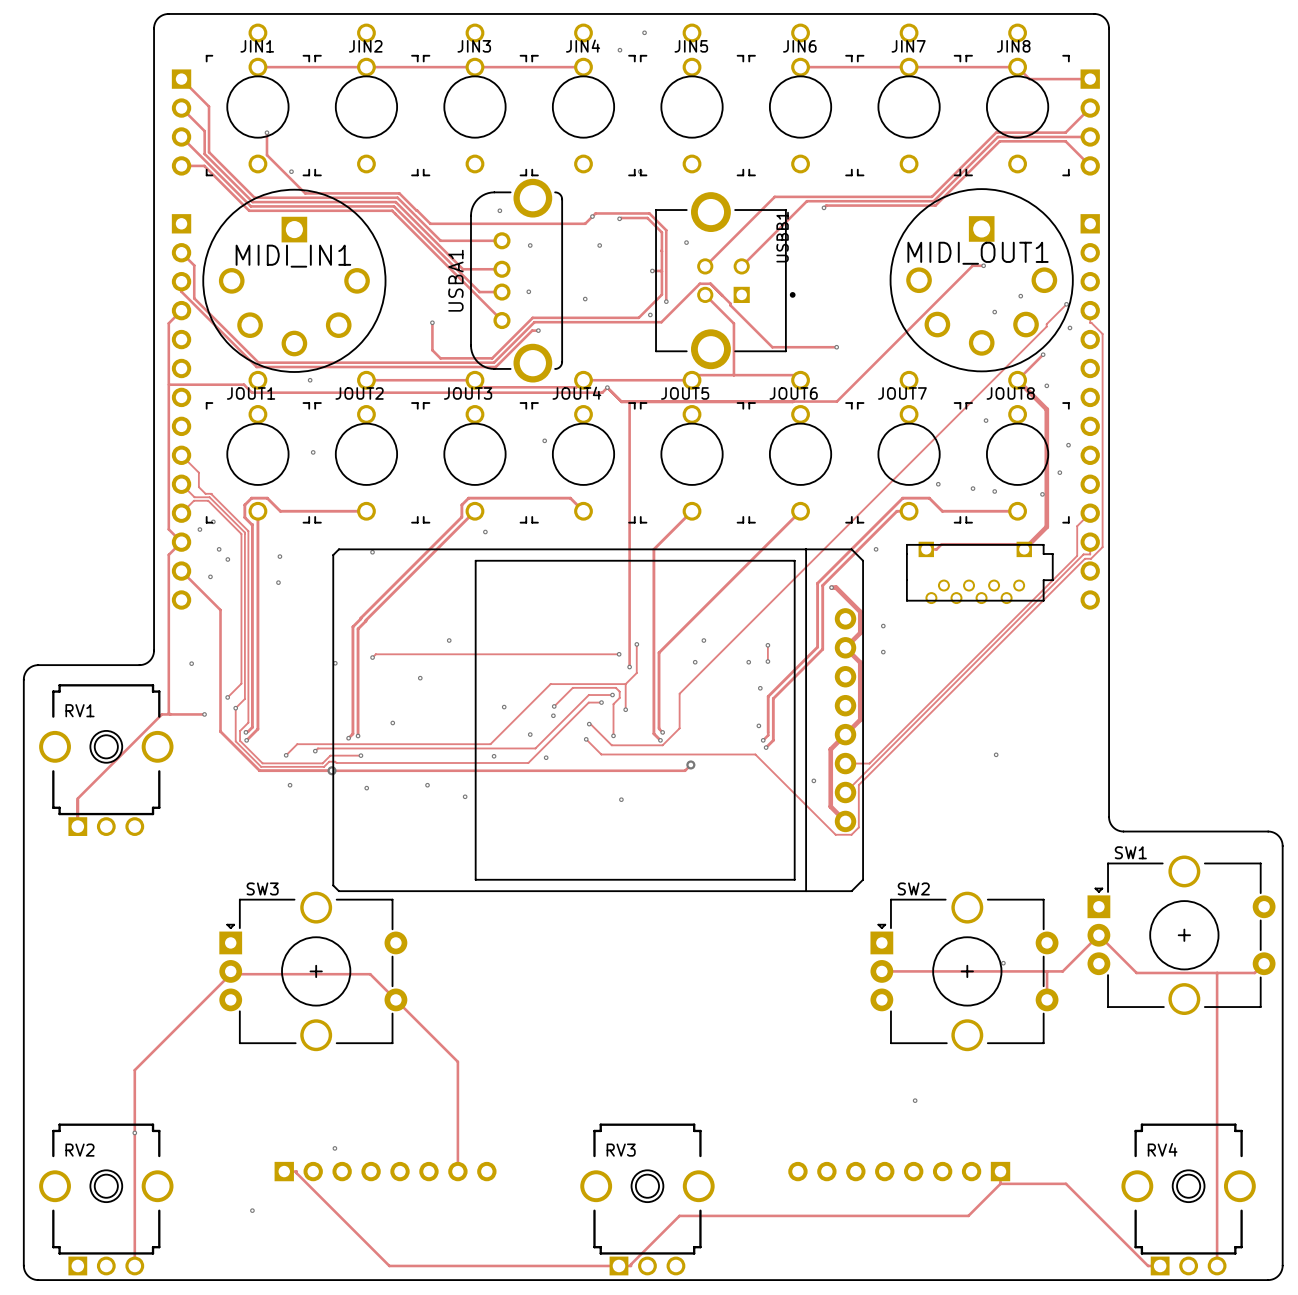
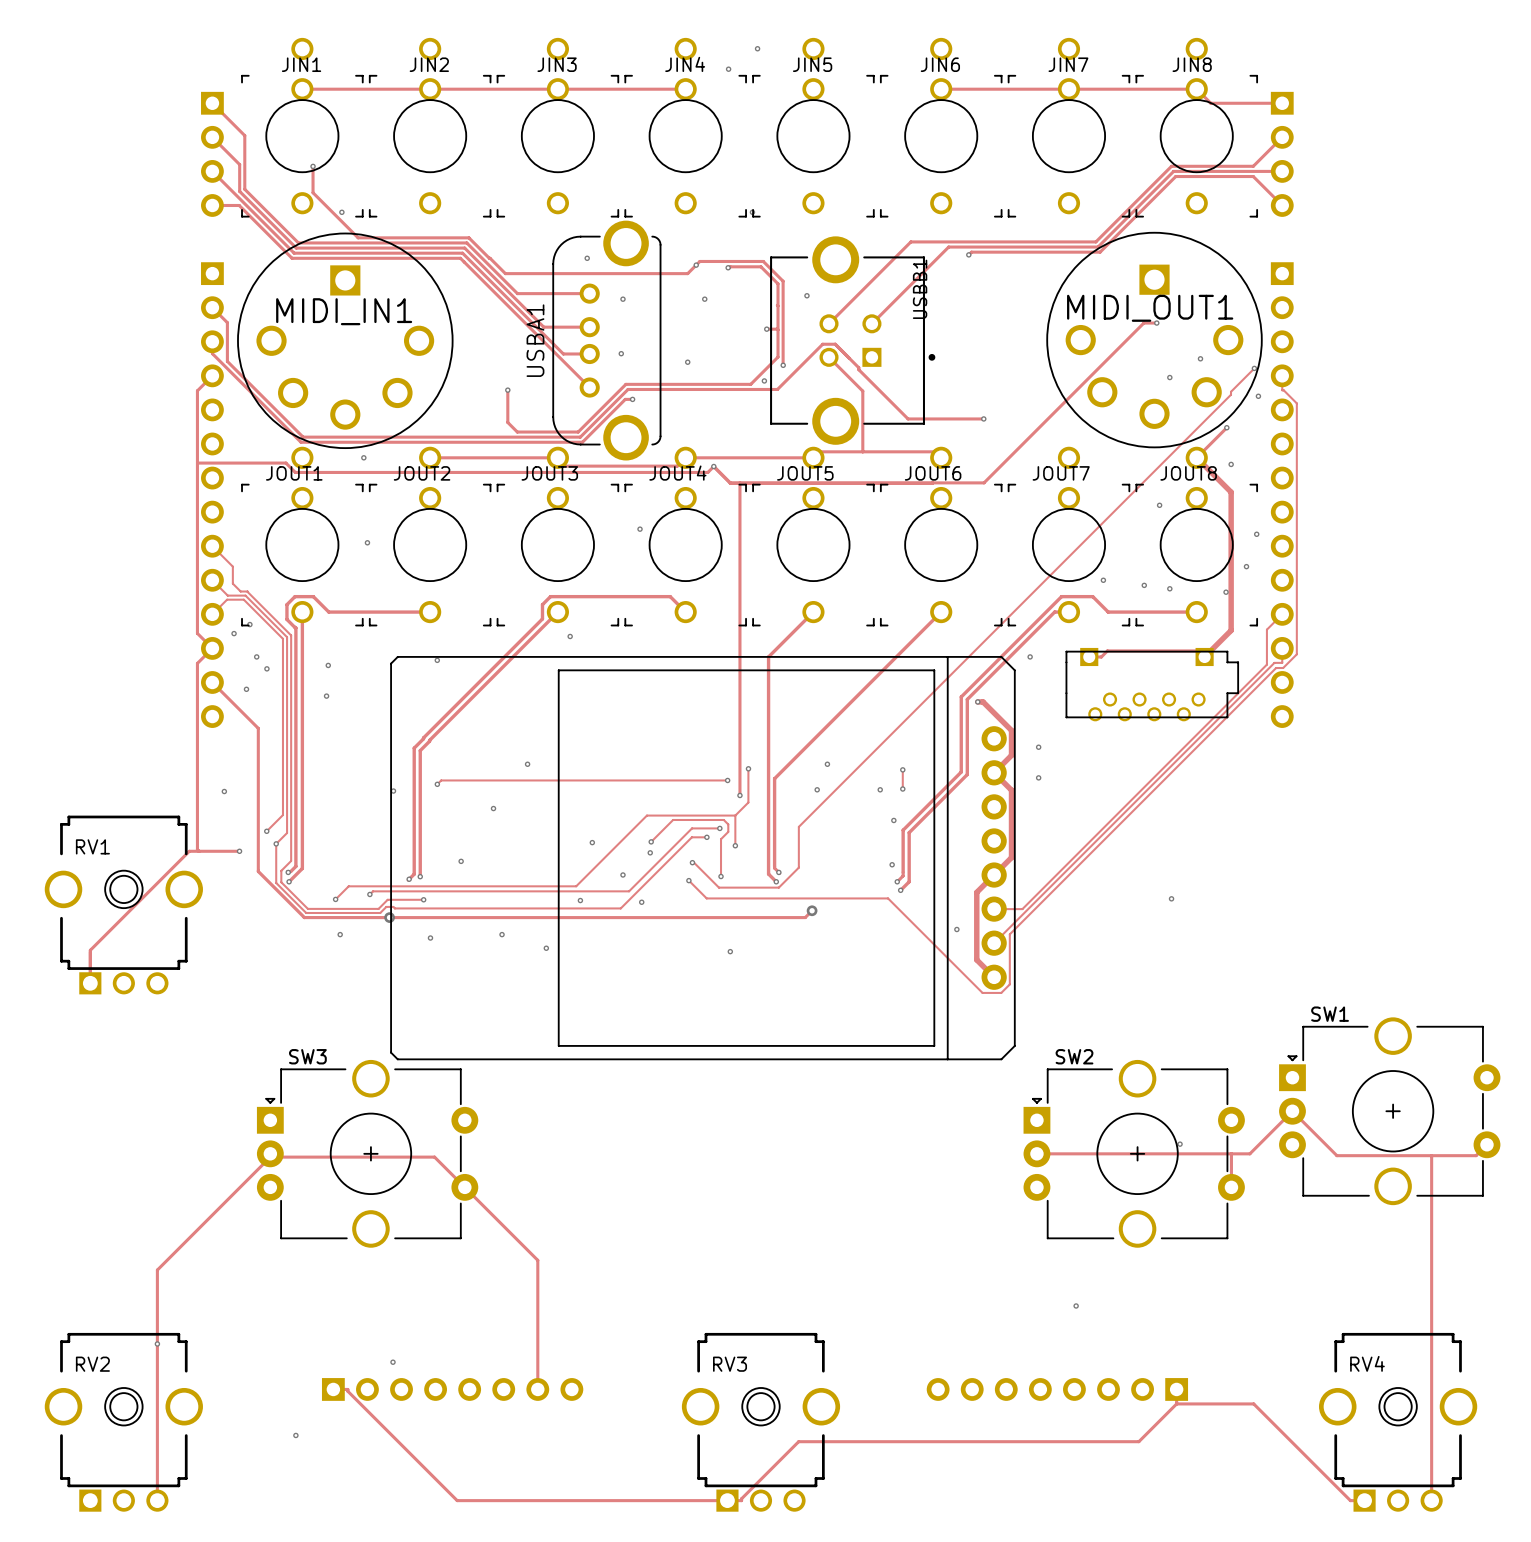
board edge: (168, 13) (1094, 13) (1104, 18) (1109, 28) (1109, 818) (1113, 827) (1121, 831) (1268, 831) (1275, 833) (1281, 840) (1282, 1265) (1278, 1275) (1268, 1280) (38, 1280) (28, 1275) (23, 1265) (23, 677) (28, 669) (36, 665) (141, 664) (148, 662) (153, 654) (154, 28) (158, 18) (168, 13) -> none

